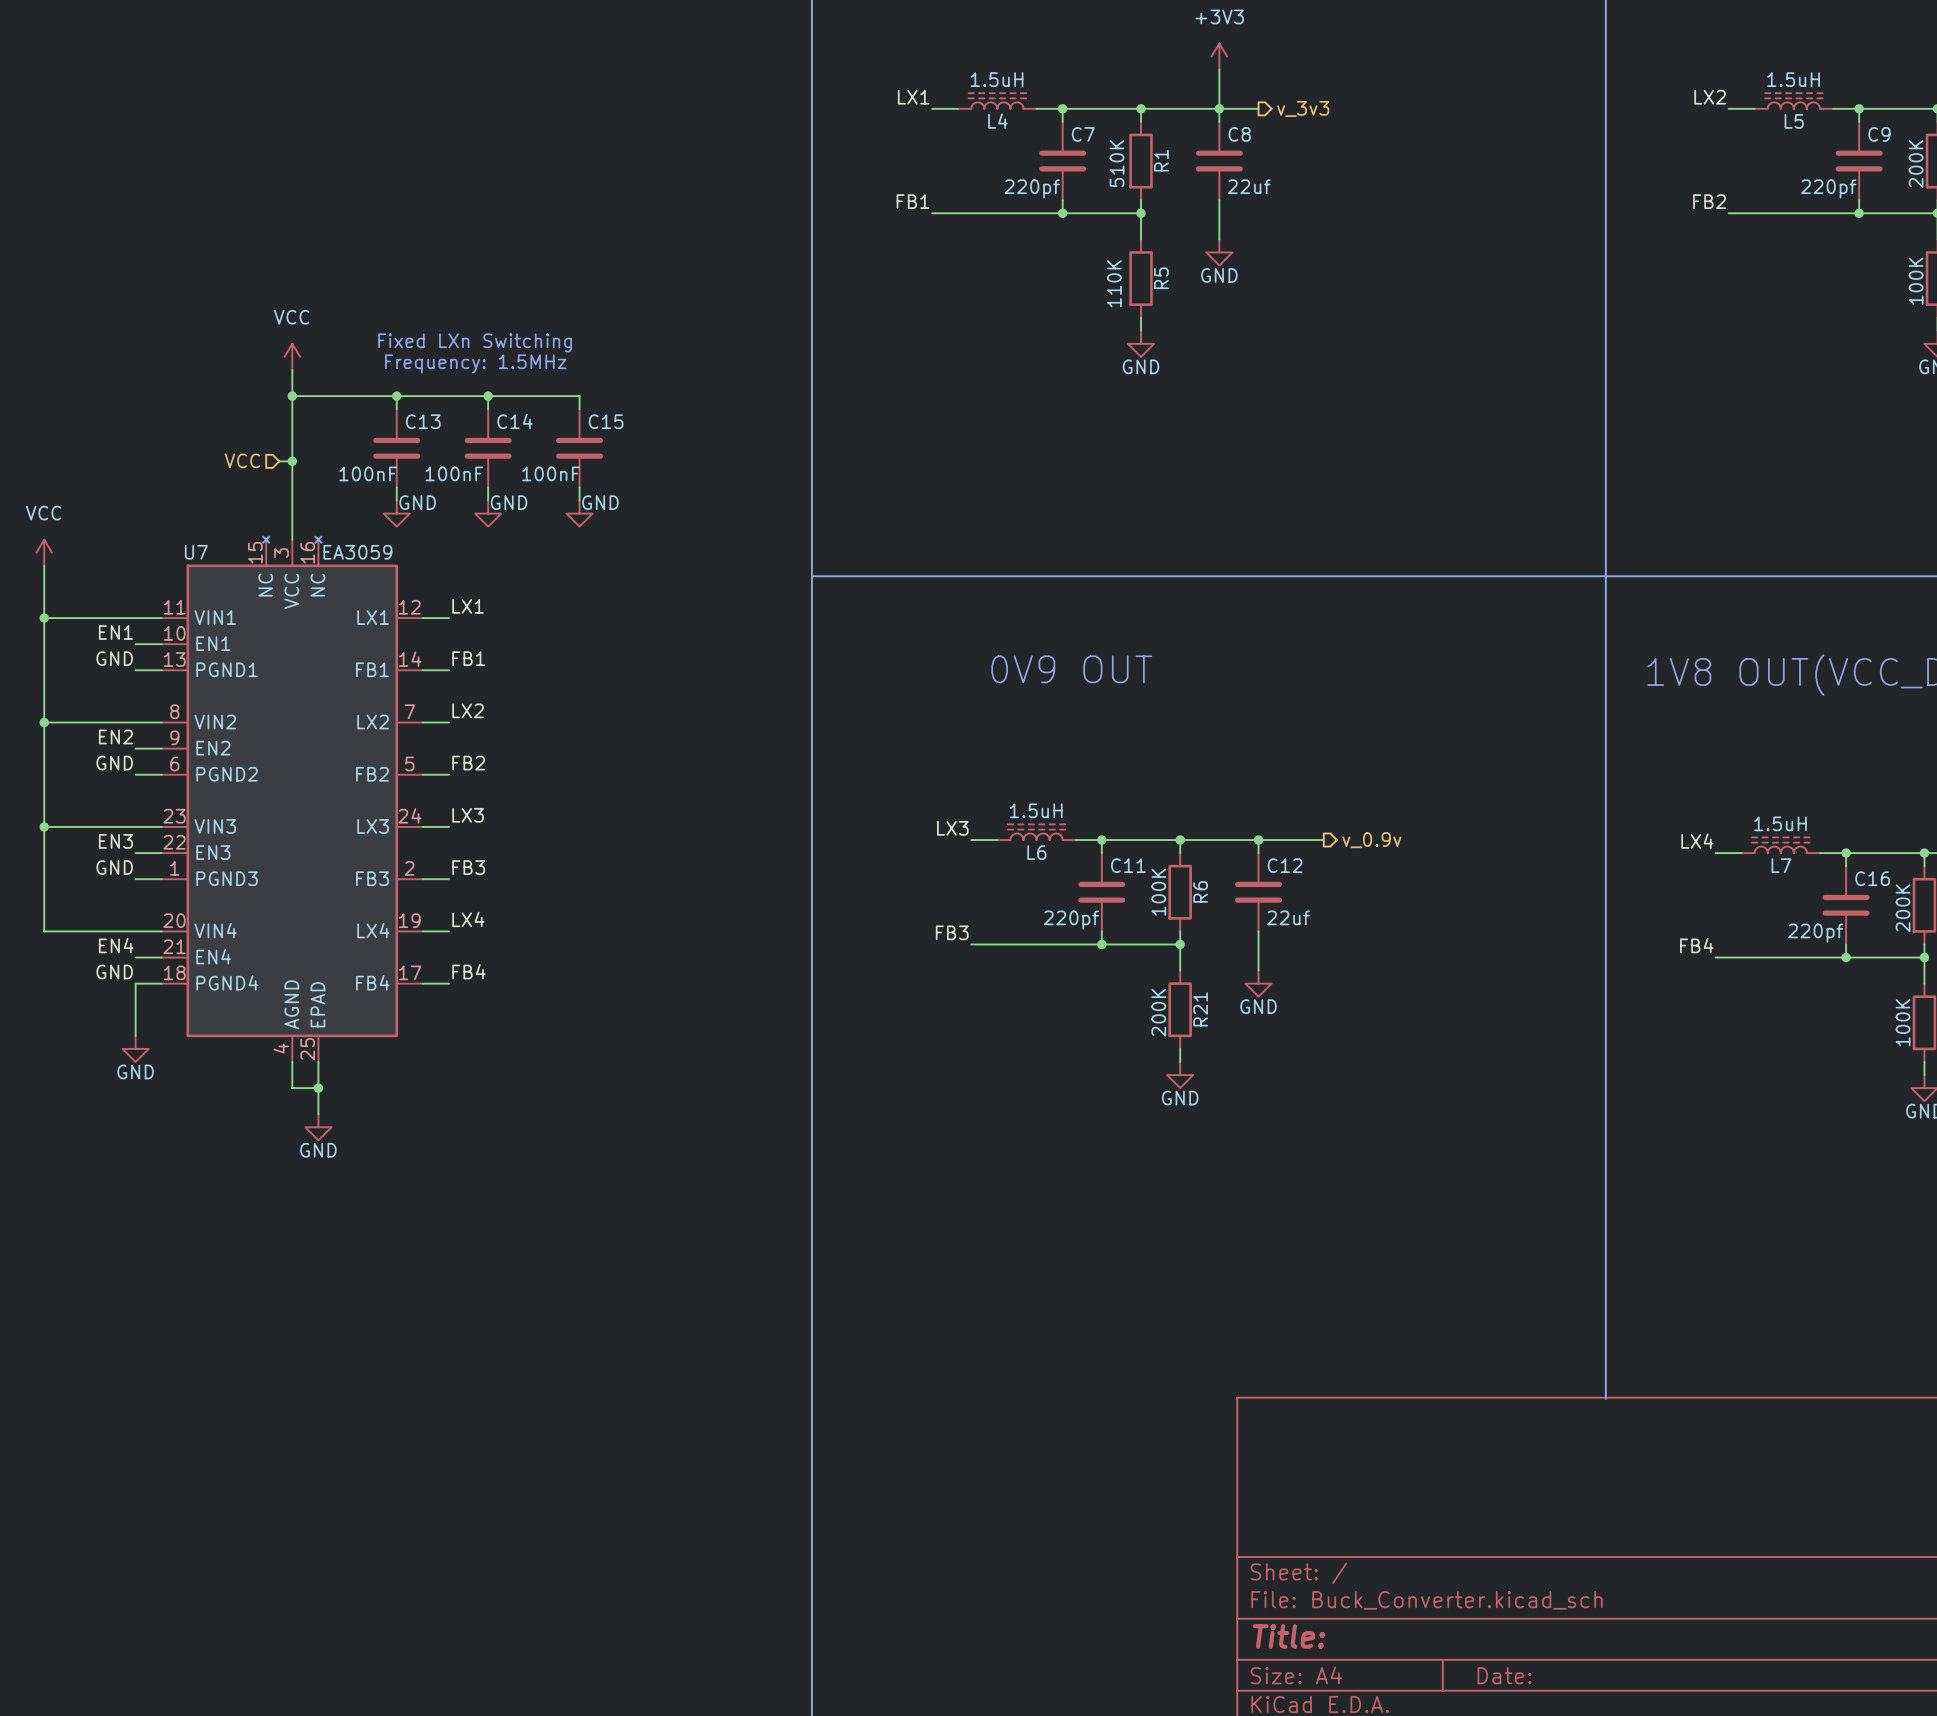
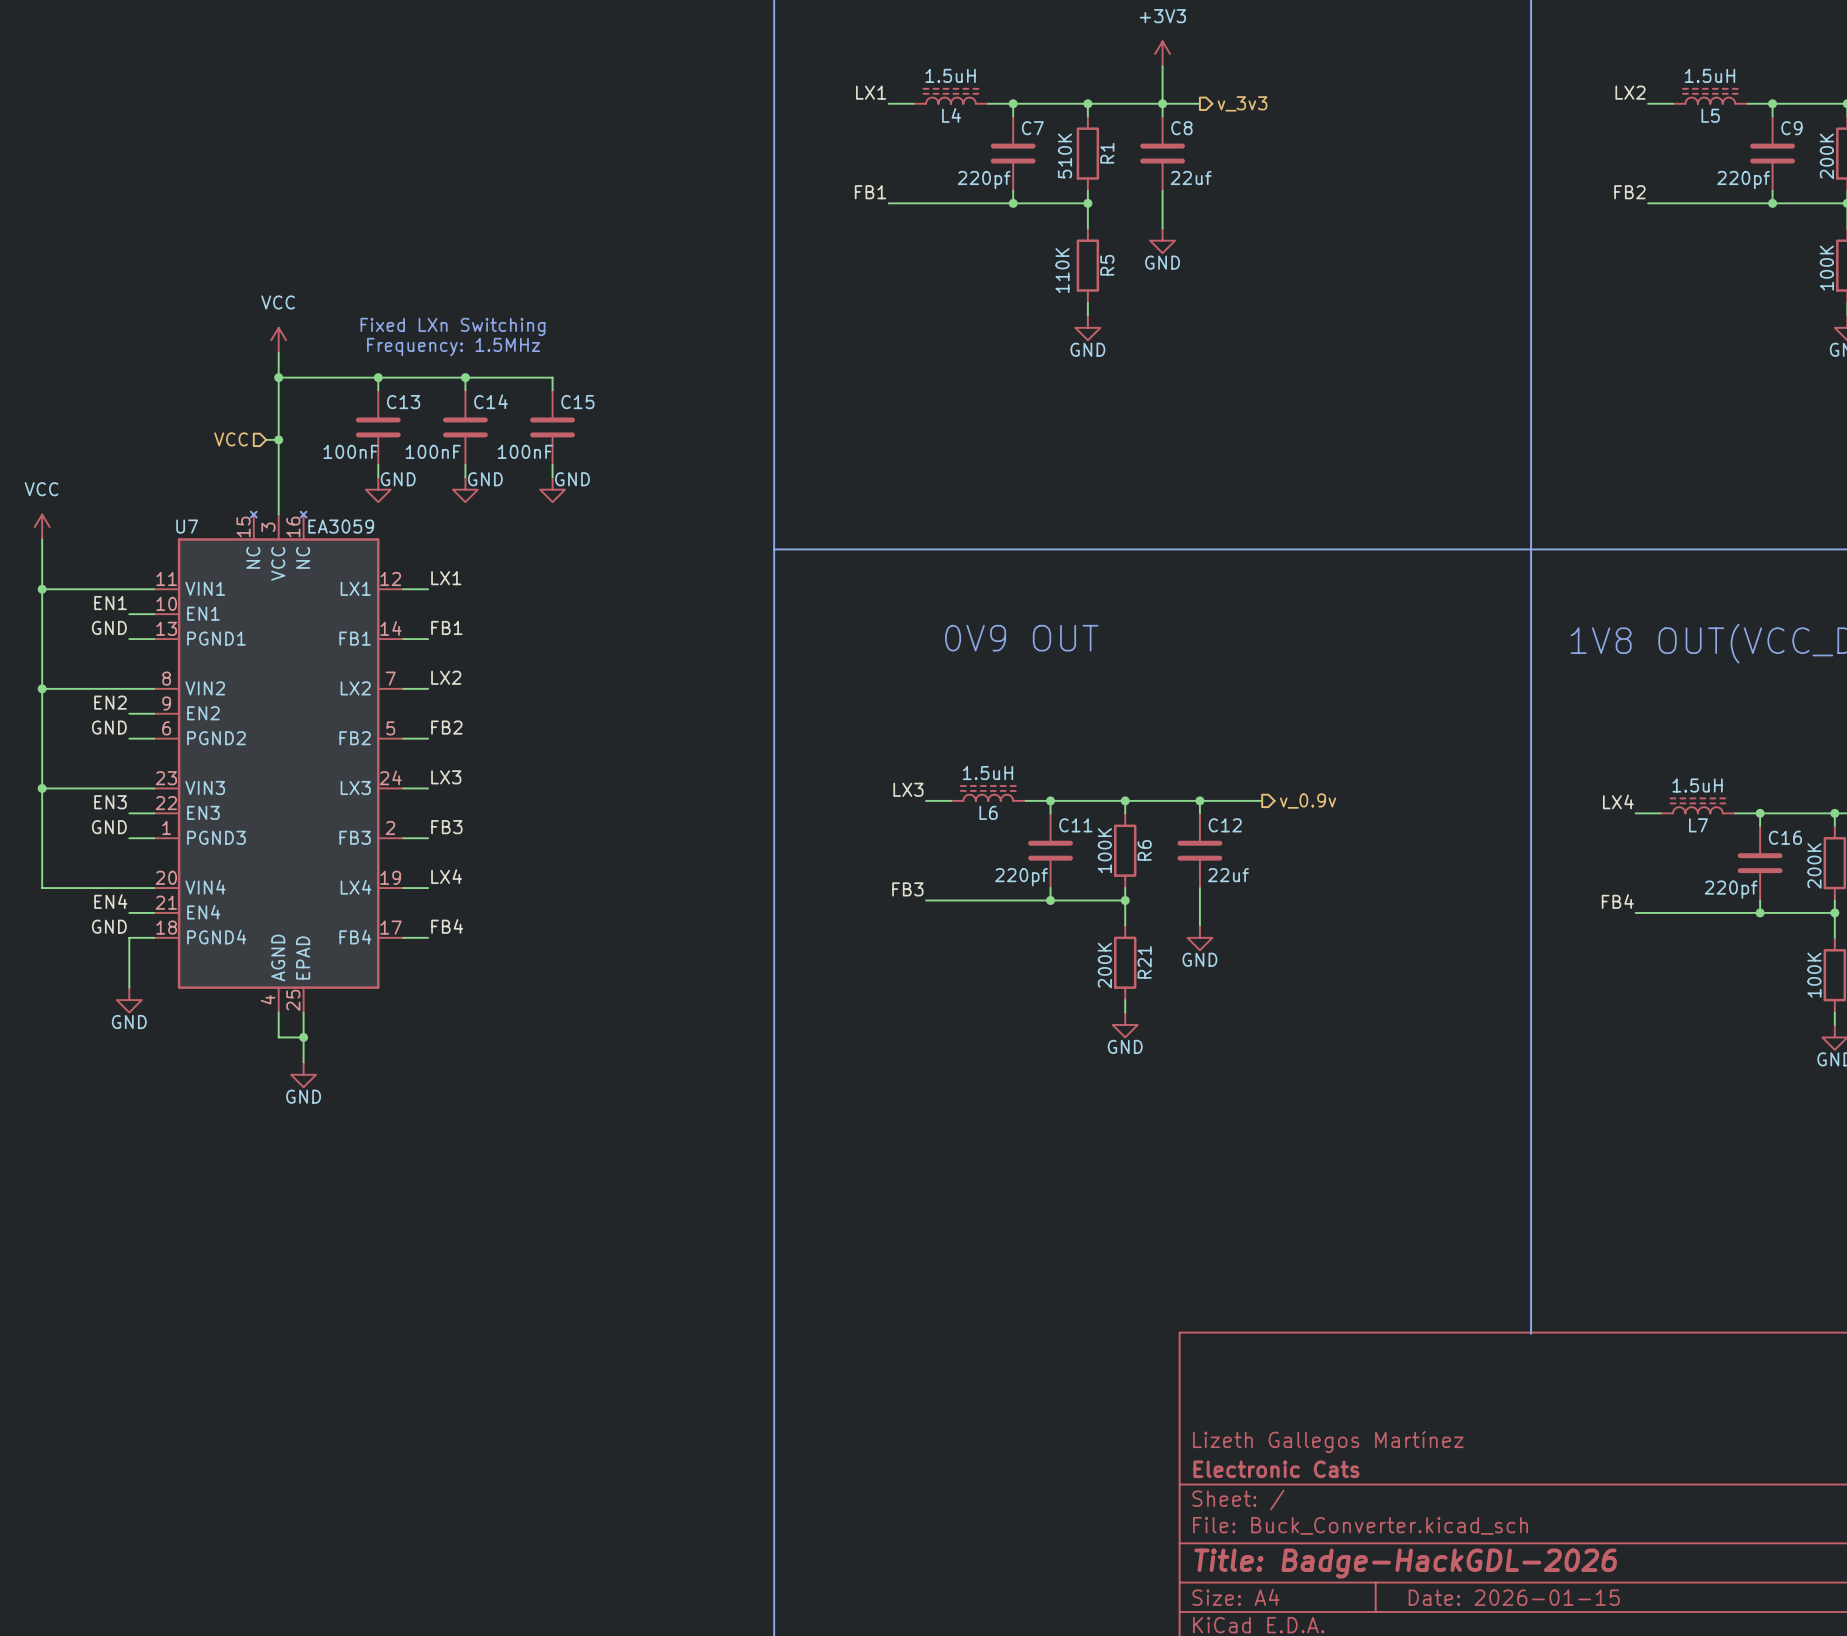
title block: none -> Lizeth Gallegos Martínez (1328, 1441)
title block: none -> Electronic Cats (1276, 1469)
title block: Title: (1288, 1636) -> Title: Badge-HackGDL-2026 (1405, 1563)
title block: Date: (1504, 1675) -> Date: 2026-01-15 (1514, 1597)

